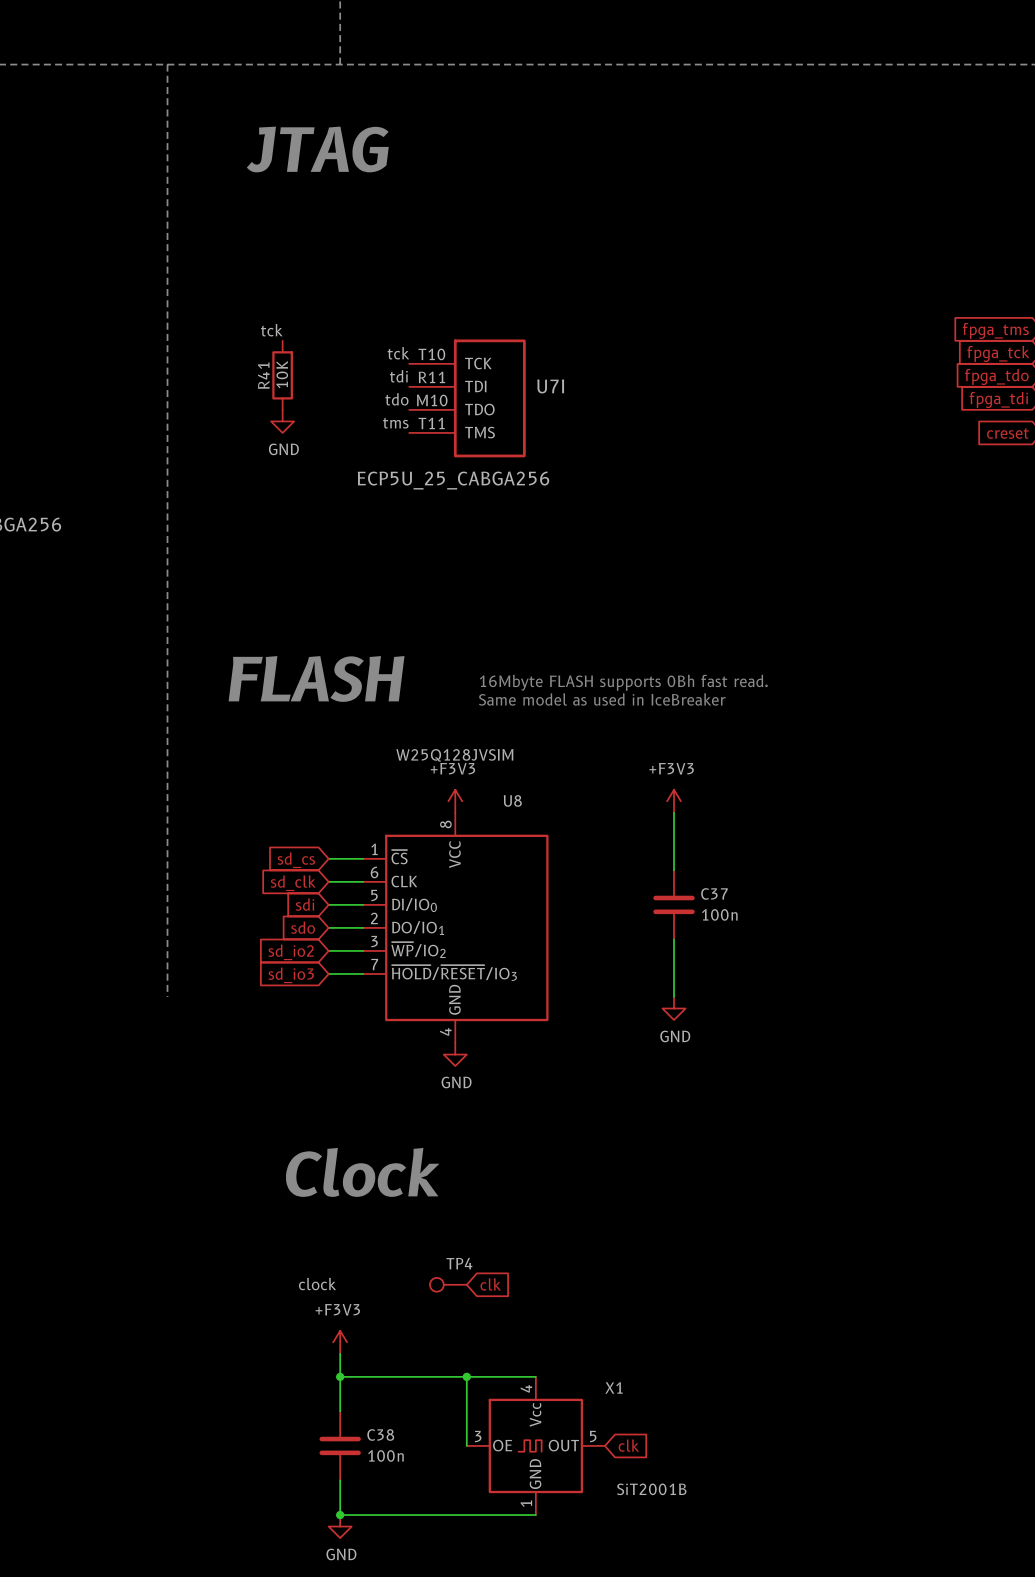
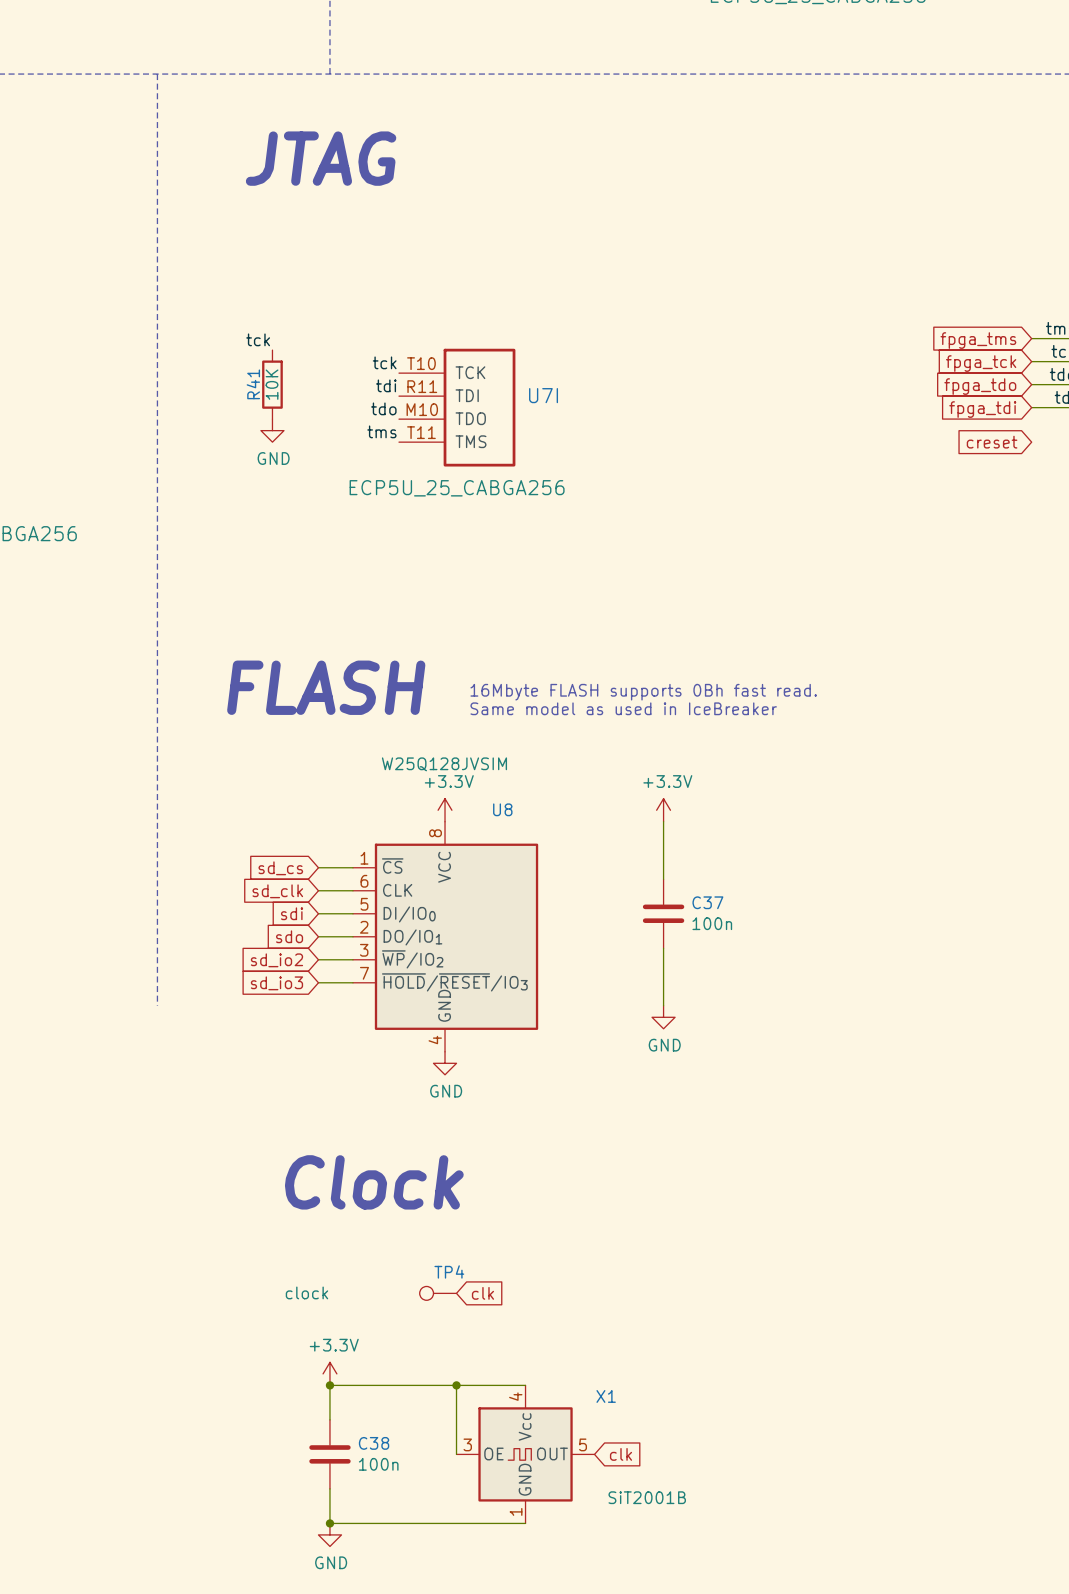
power symbol: +F3V3 (455, 801) -> +3.3V (445, 810)
power symbol: +F3V3 (674, 801) -> +3.3V (663, 810)
power symbol: +F3V3 (340, 1342) -> none
power symbol: none -> +3.3V (329, 1373)

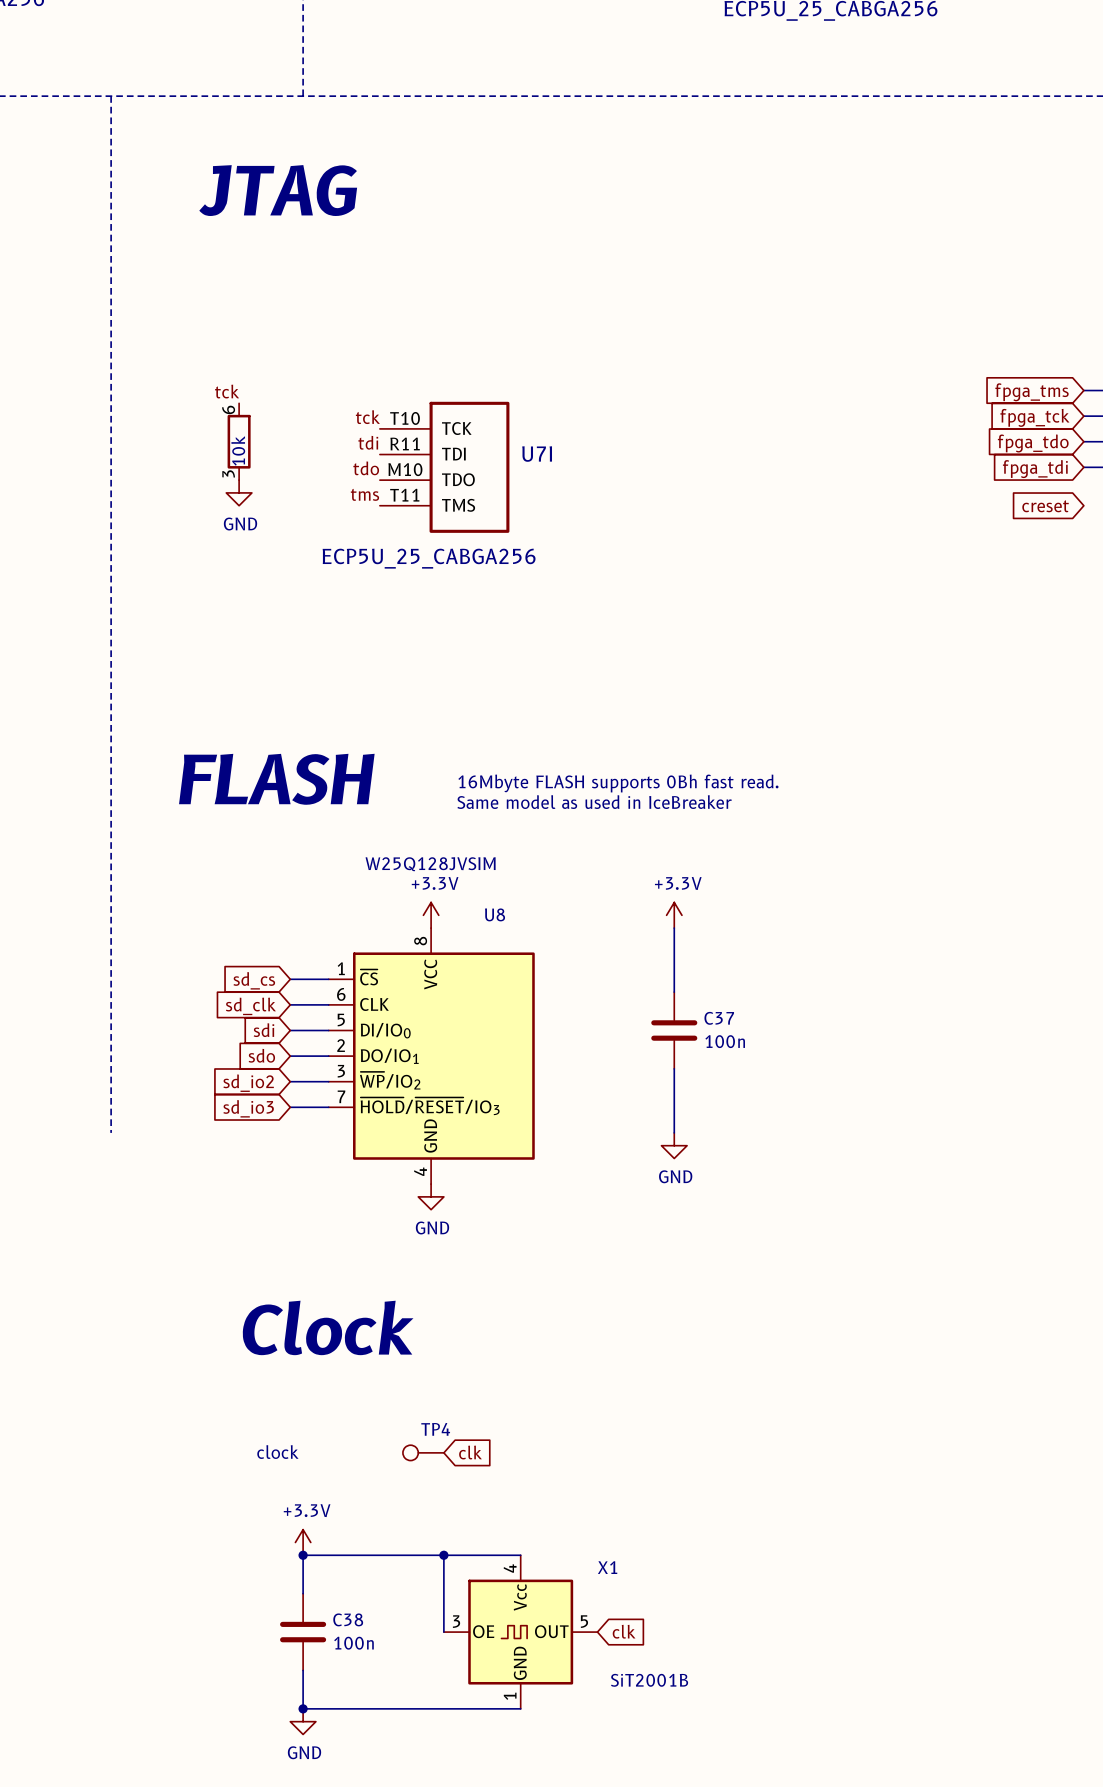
R41 pin number: none -> 6 (228, 409)
R41 name: R41 (253, 384) -> none
R41 value: 10K (272, 384) -> 10k (238, 450)
R41 pin number: none -> 3 (228, 473)

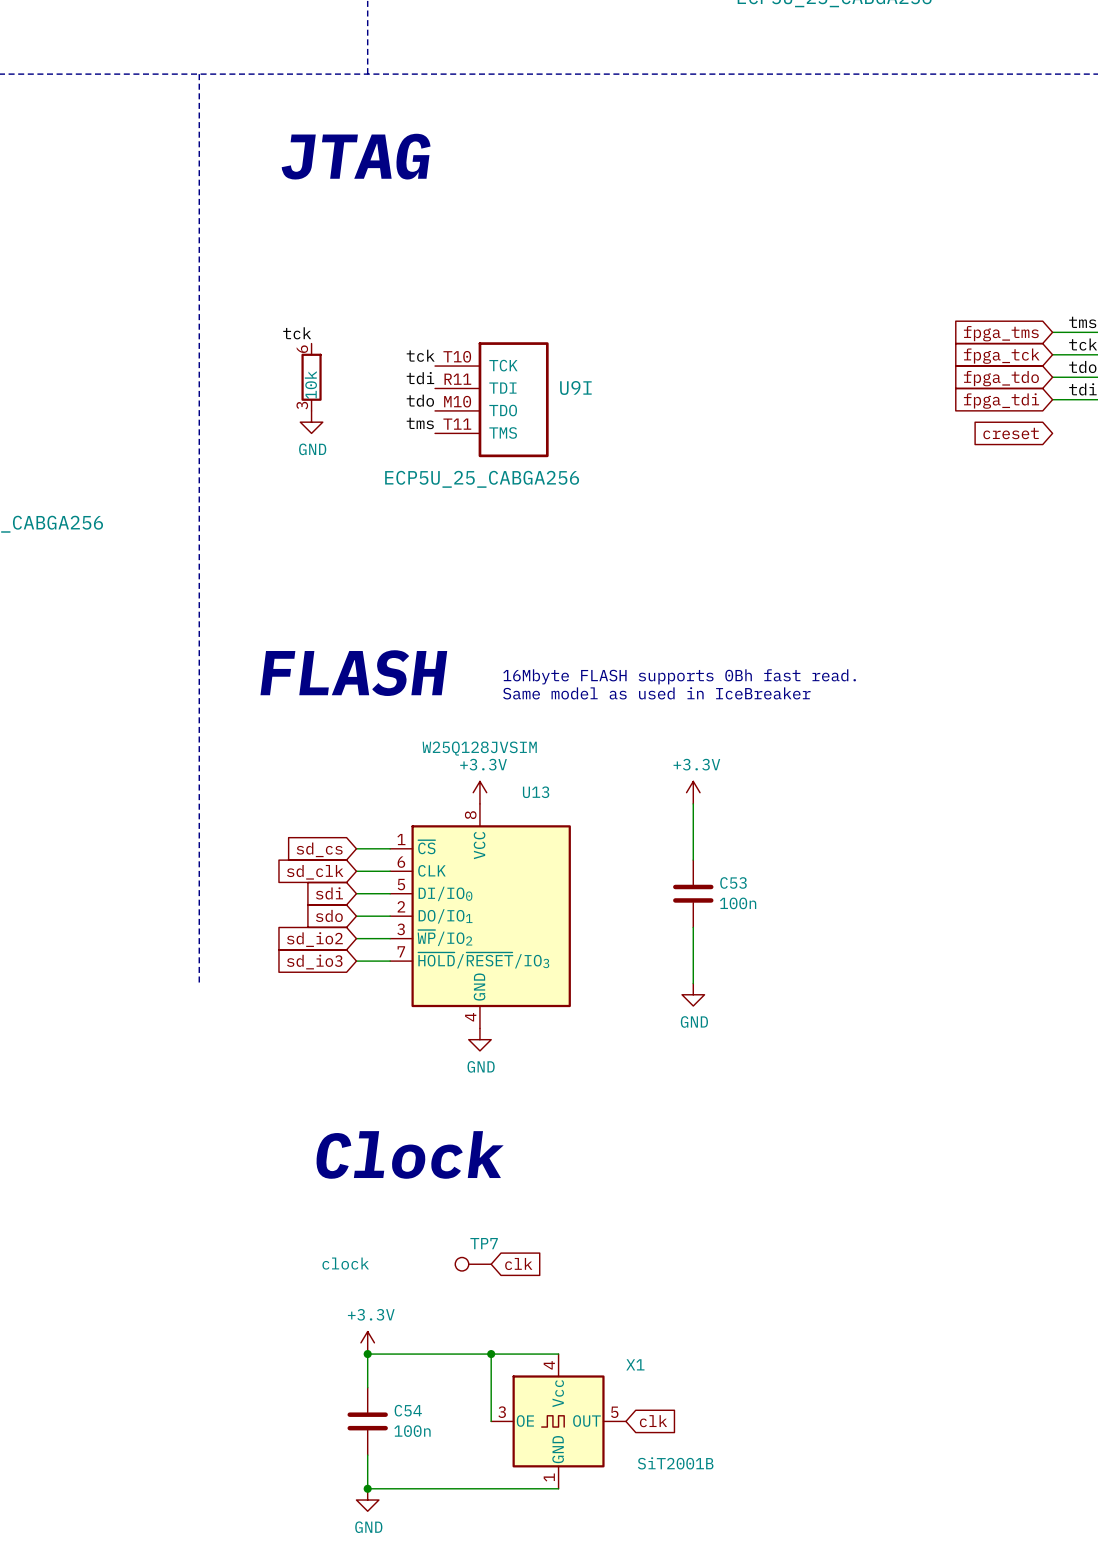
U7I name: U7I (537, 454) -> U9I (575, 387)
U8 name: U8 (495, 914) -> U13 (536, 792)
C37 name: C37 (719, 1018) -> C53 (733, 882)
TP4 name: TP4 (435, 1429) -> TP7 (484, 1243)
C38 name: C38 (348, 1619) -> C54 (408, 1410)

